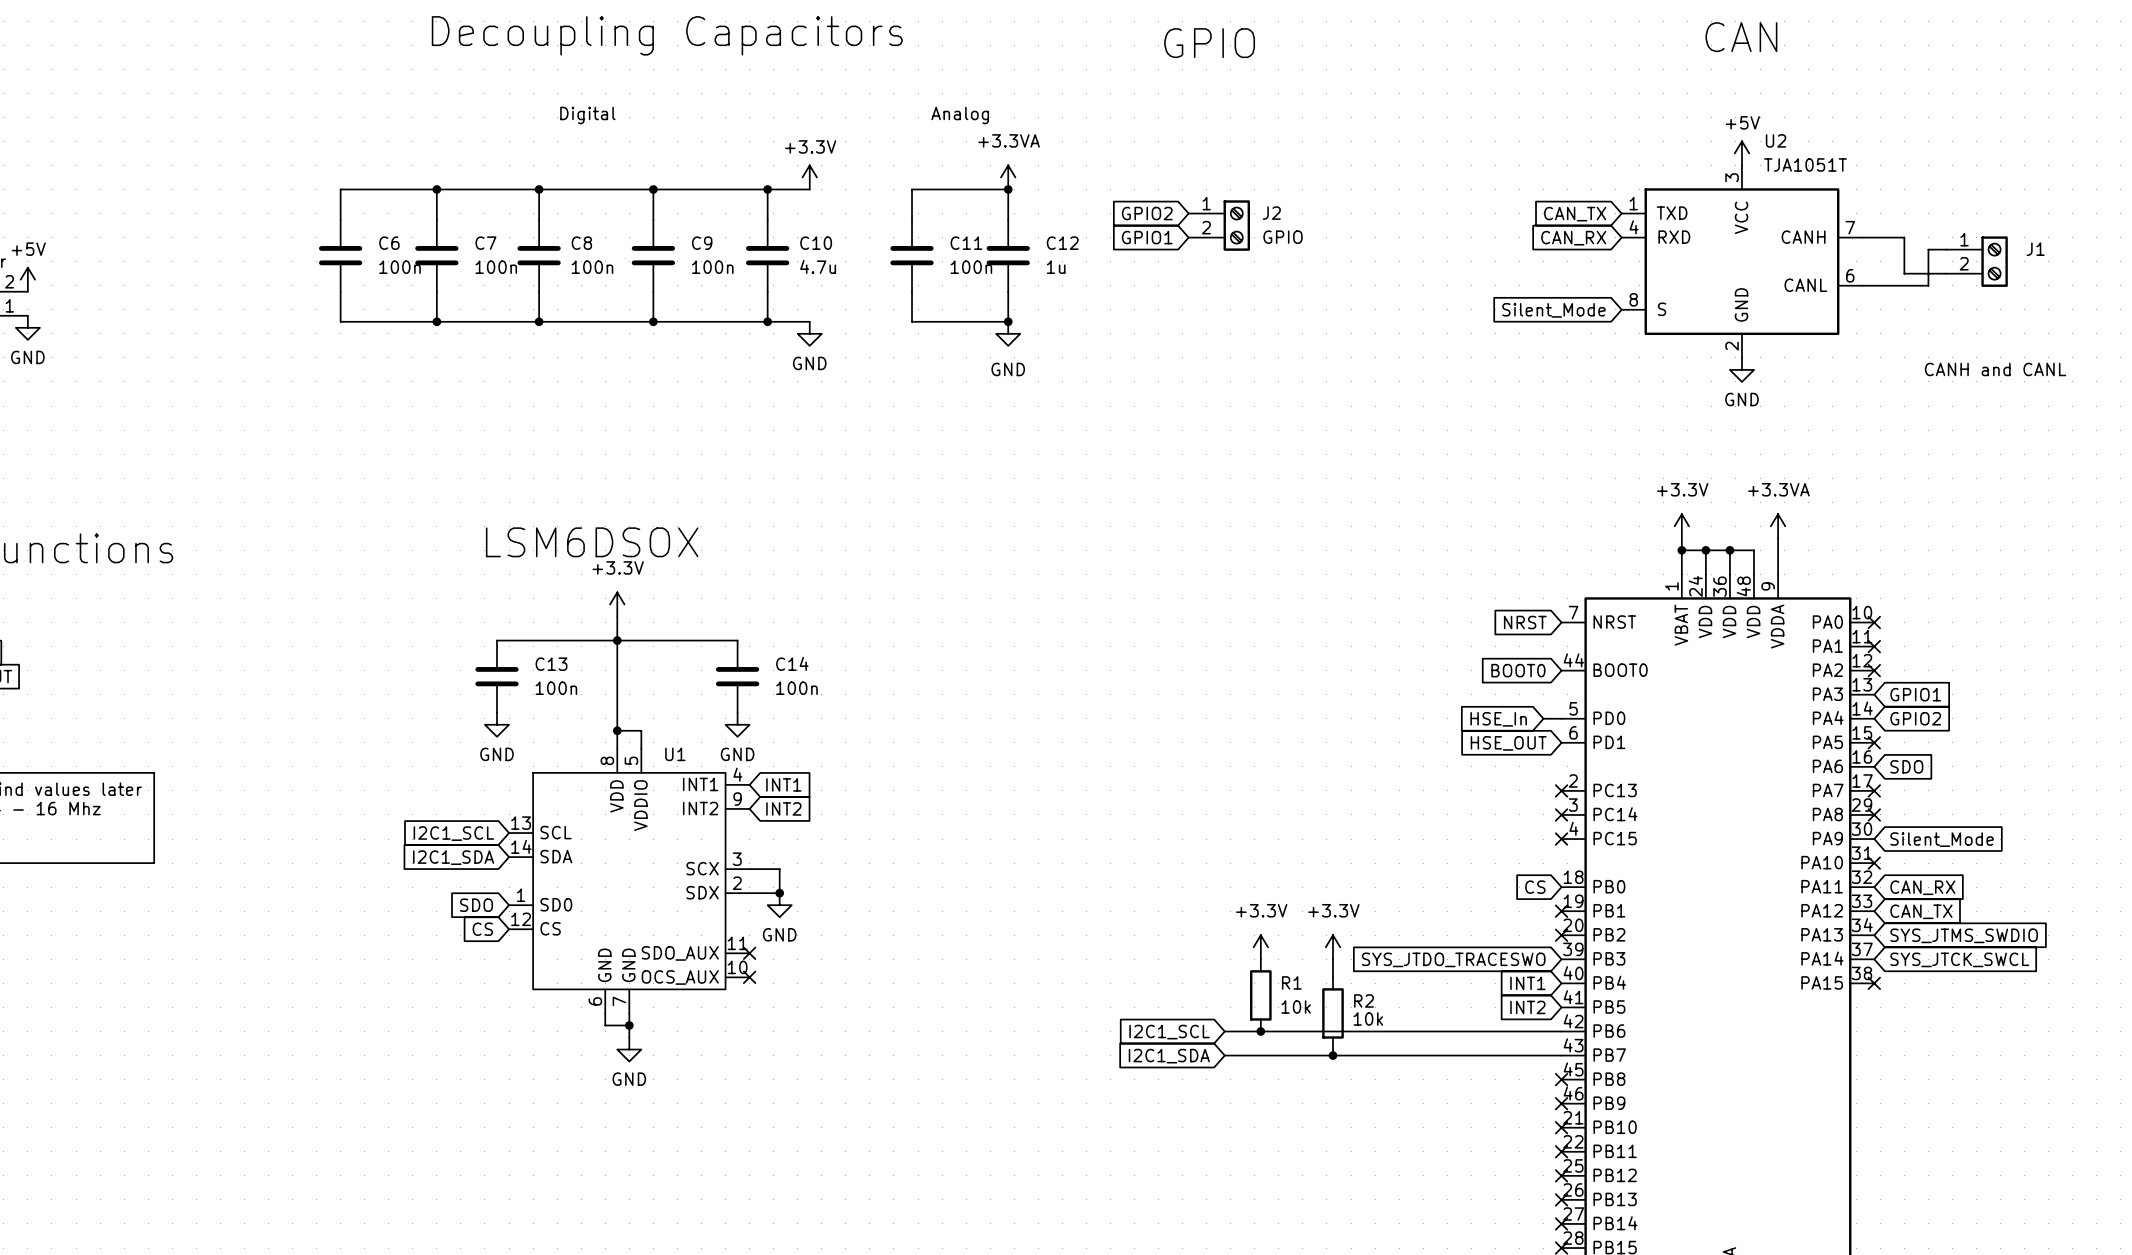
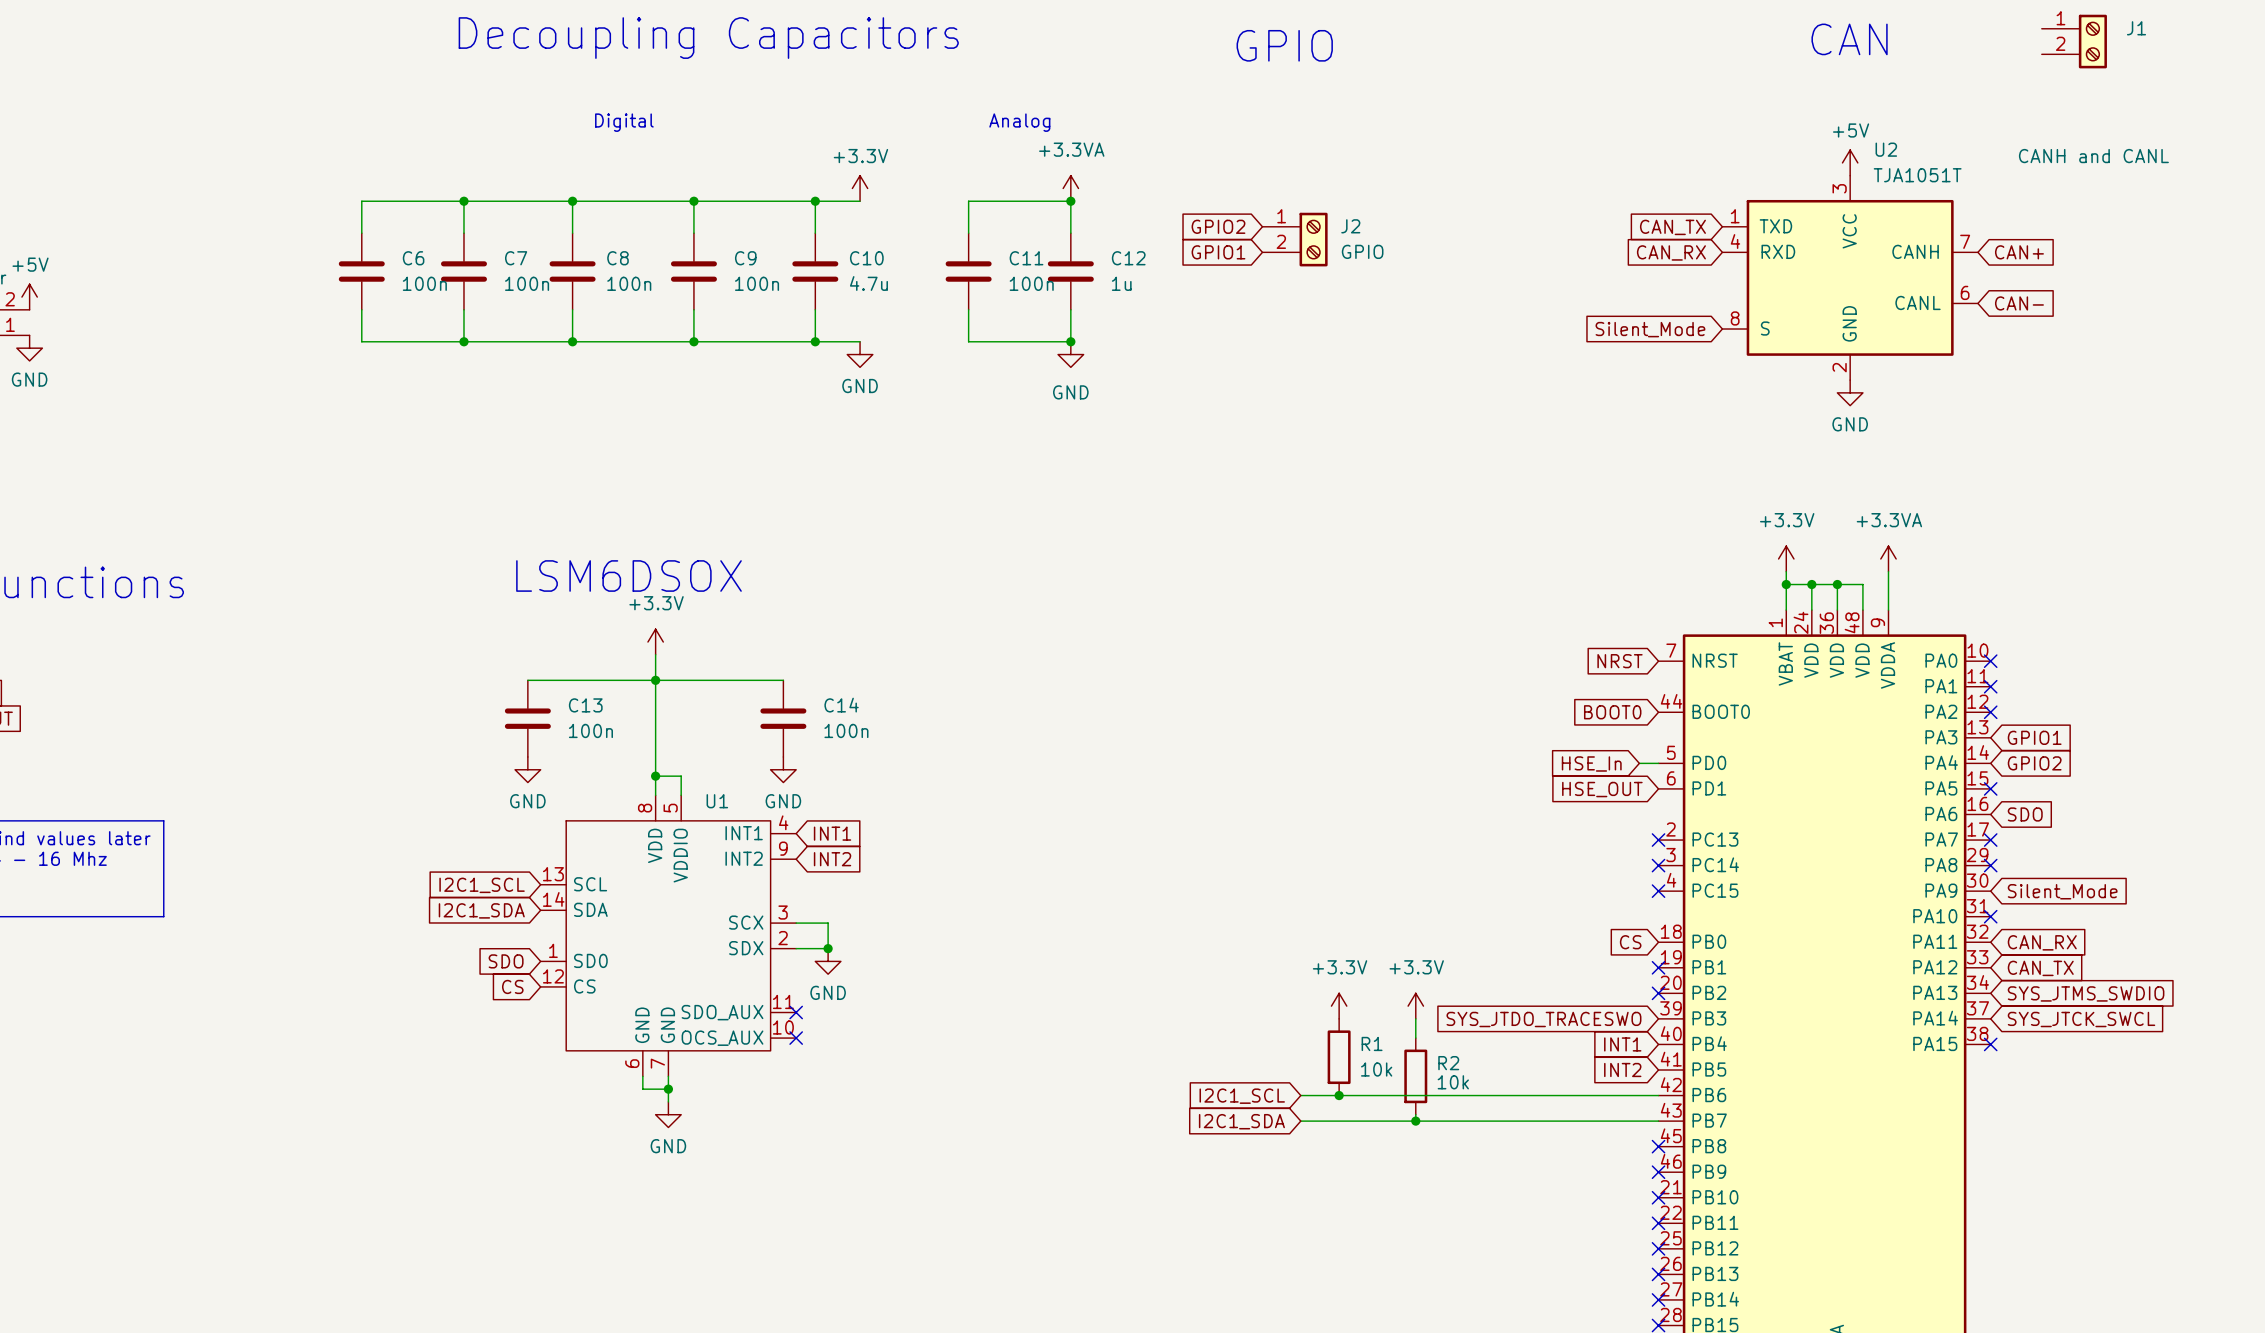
wire: (1862, 237) (1904, 237) (1904, 273) (1946, 273) -> none
global label: none -> CAN+ (2019, 252)
wire: (1946, 249) (1928, 249) (1928, 285) (1862, 285) -> none
J1 position: (1977, 261) -> (2074, 41)
global label: none -> CAN- (2019, 303)

